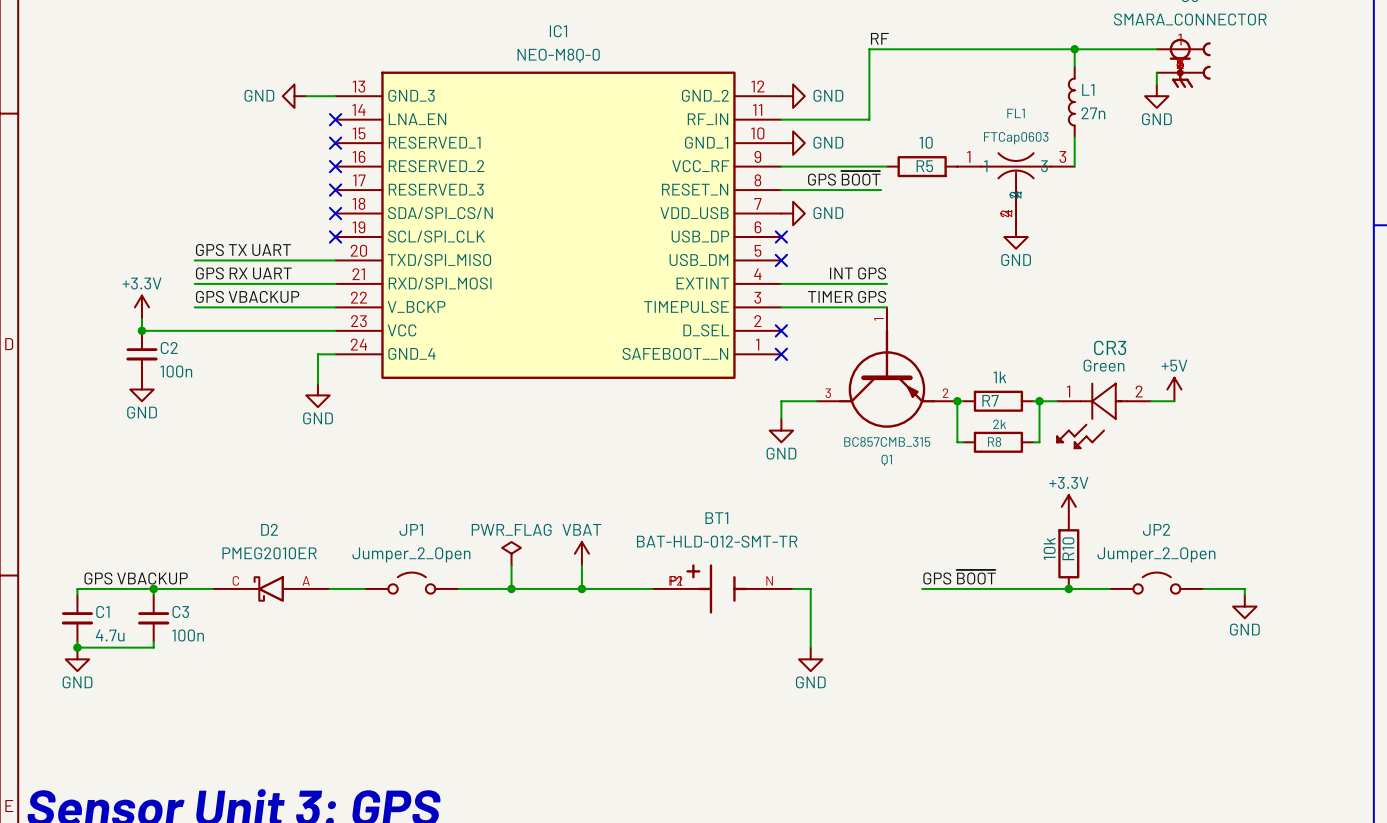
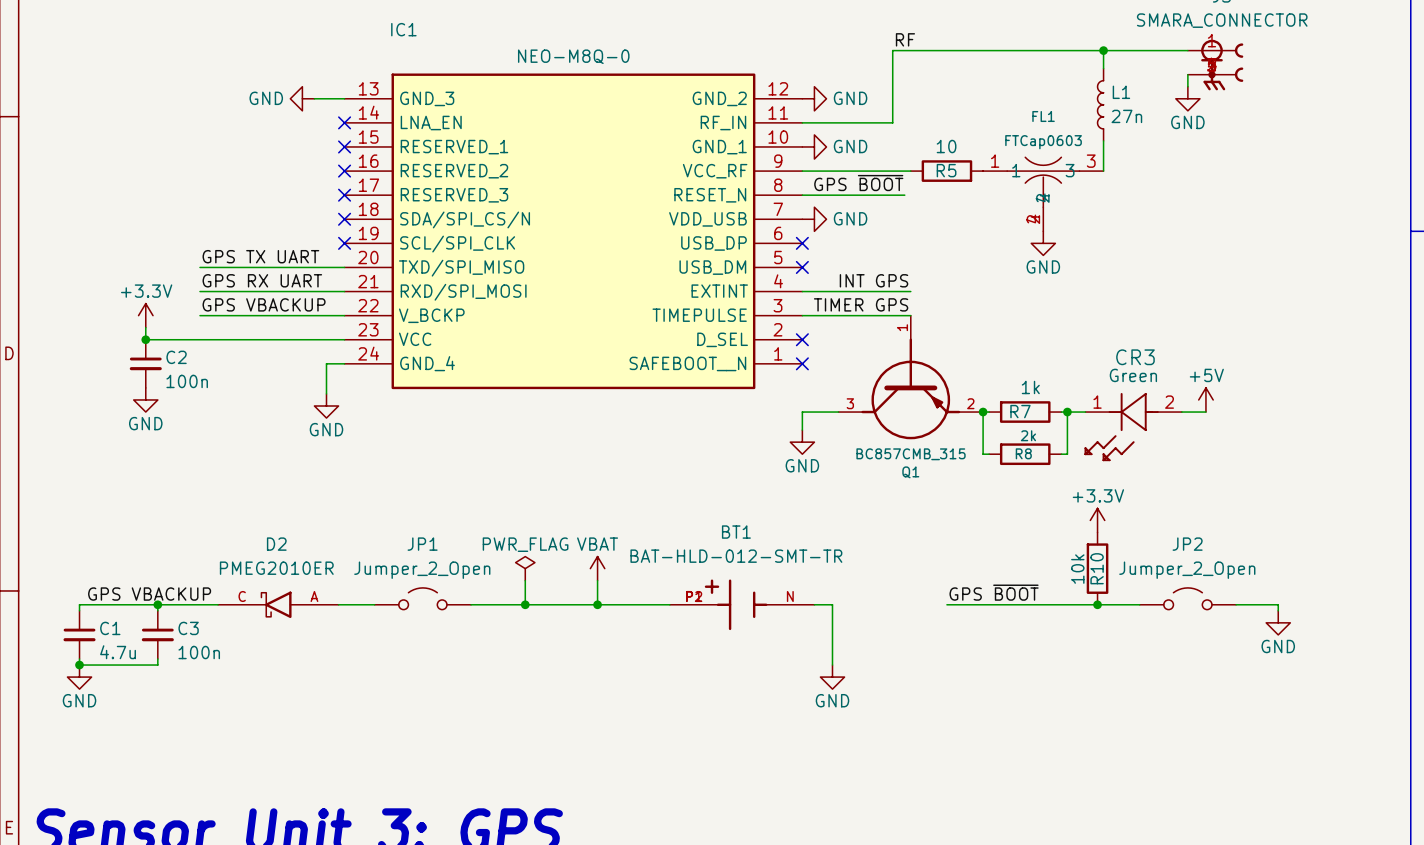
IC1 name position: IC1 (558, 31) -> IC1 (403, 29)

